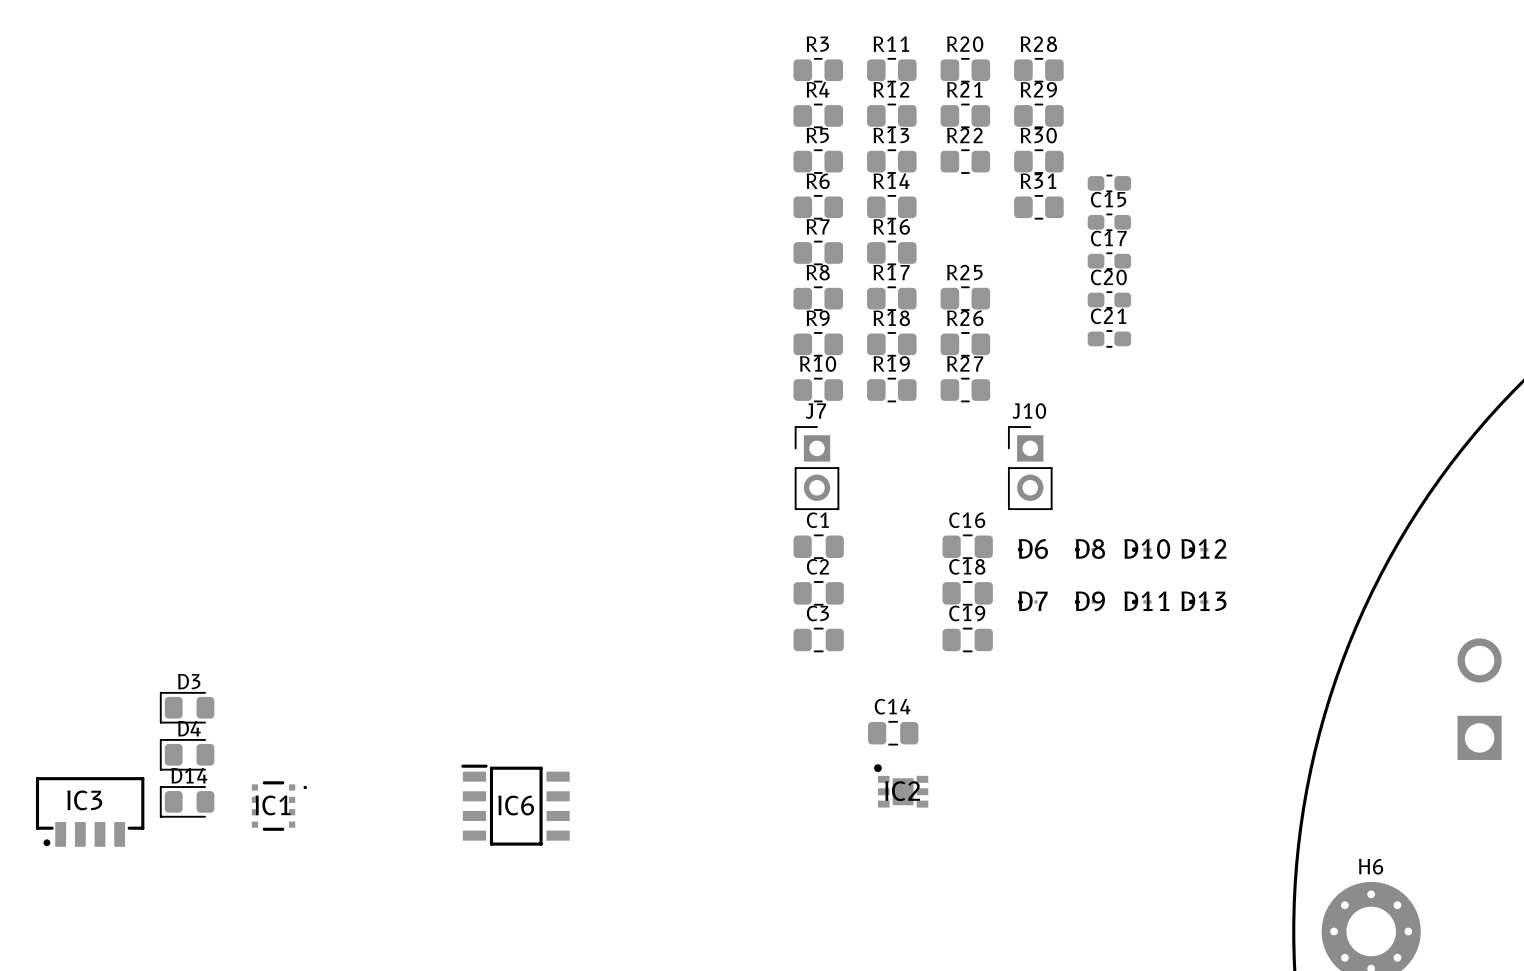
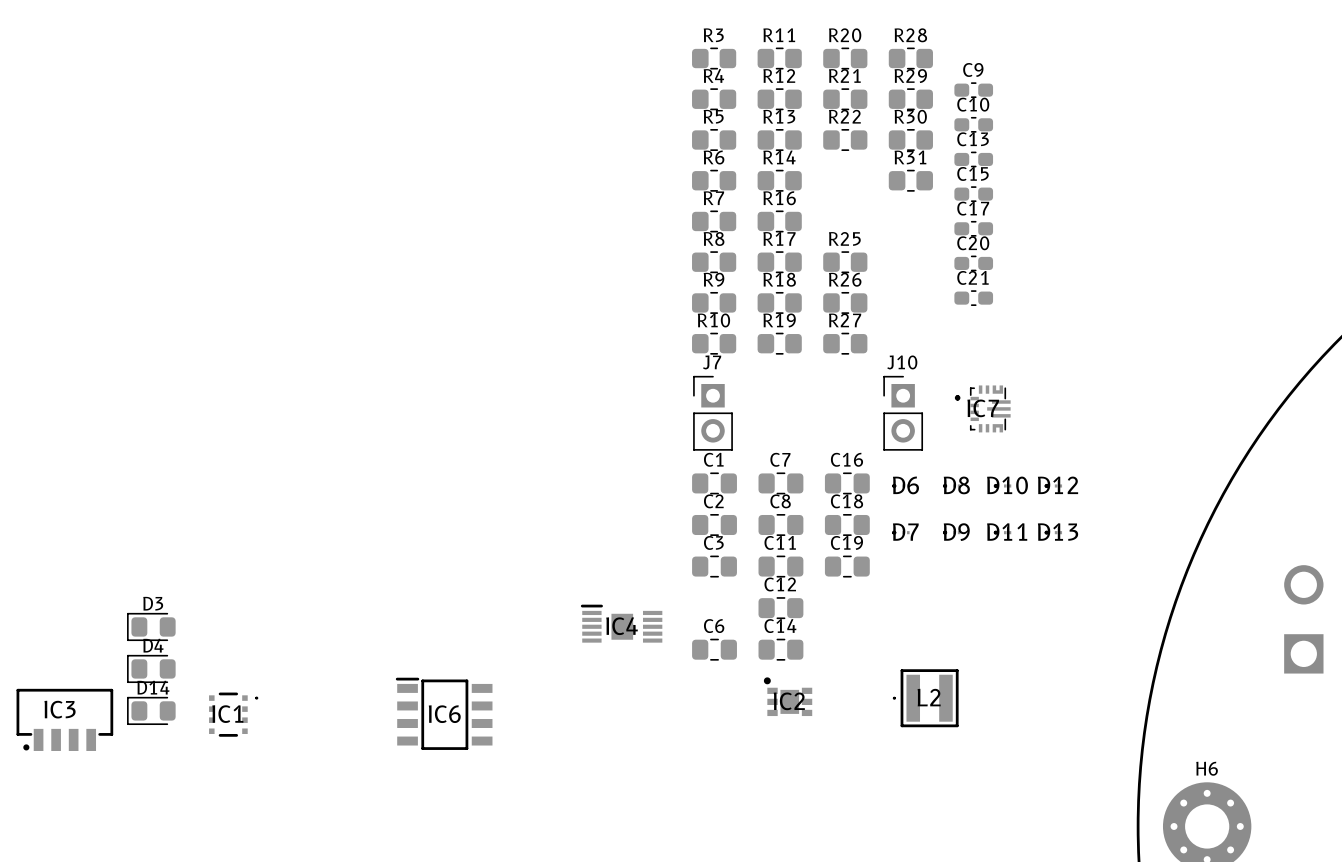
C9: none -> (973, 90)
C10: none -> (973, 124)
C13 name: none -> C13 (973, 139)
IC7: none -> (982, 408)
C7: none -> (780, 483)
C8: none -> (780, 524)
C11: none -> (780, 566)
C12: none -> (780, 608)
IC4: none -> (621, 623)
C6: none -> (714, 649)
L2: none -> (925, 698)

